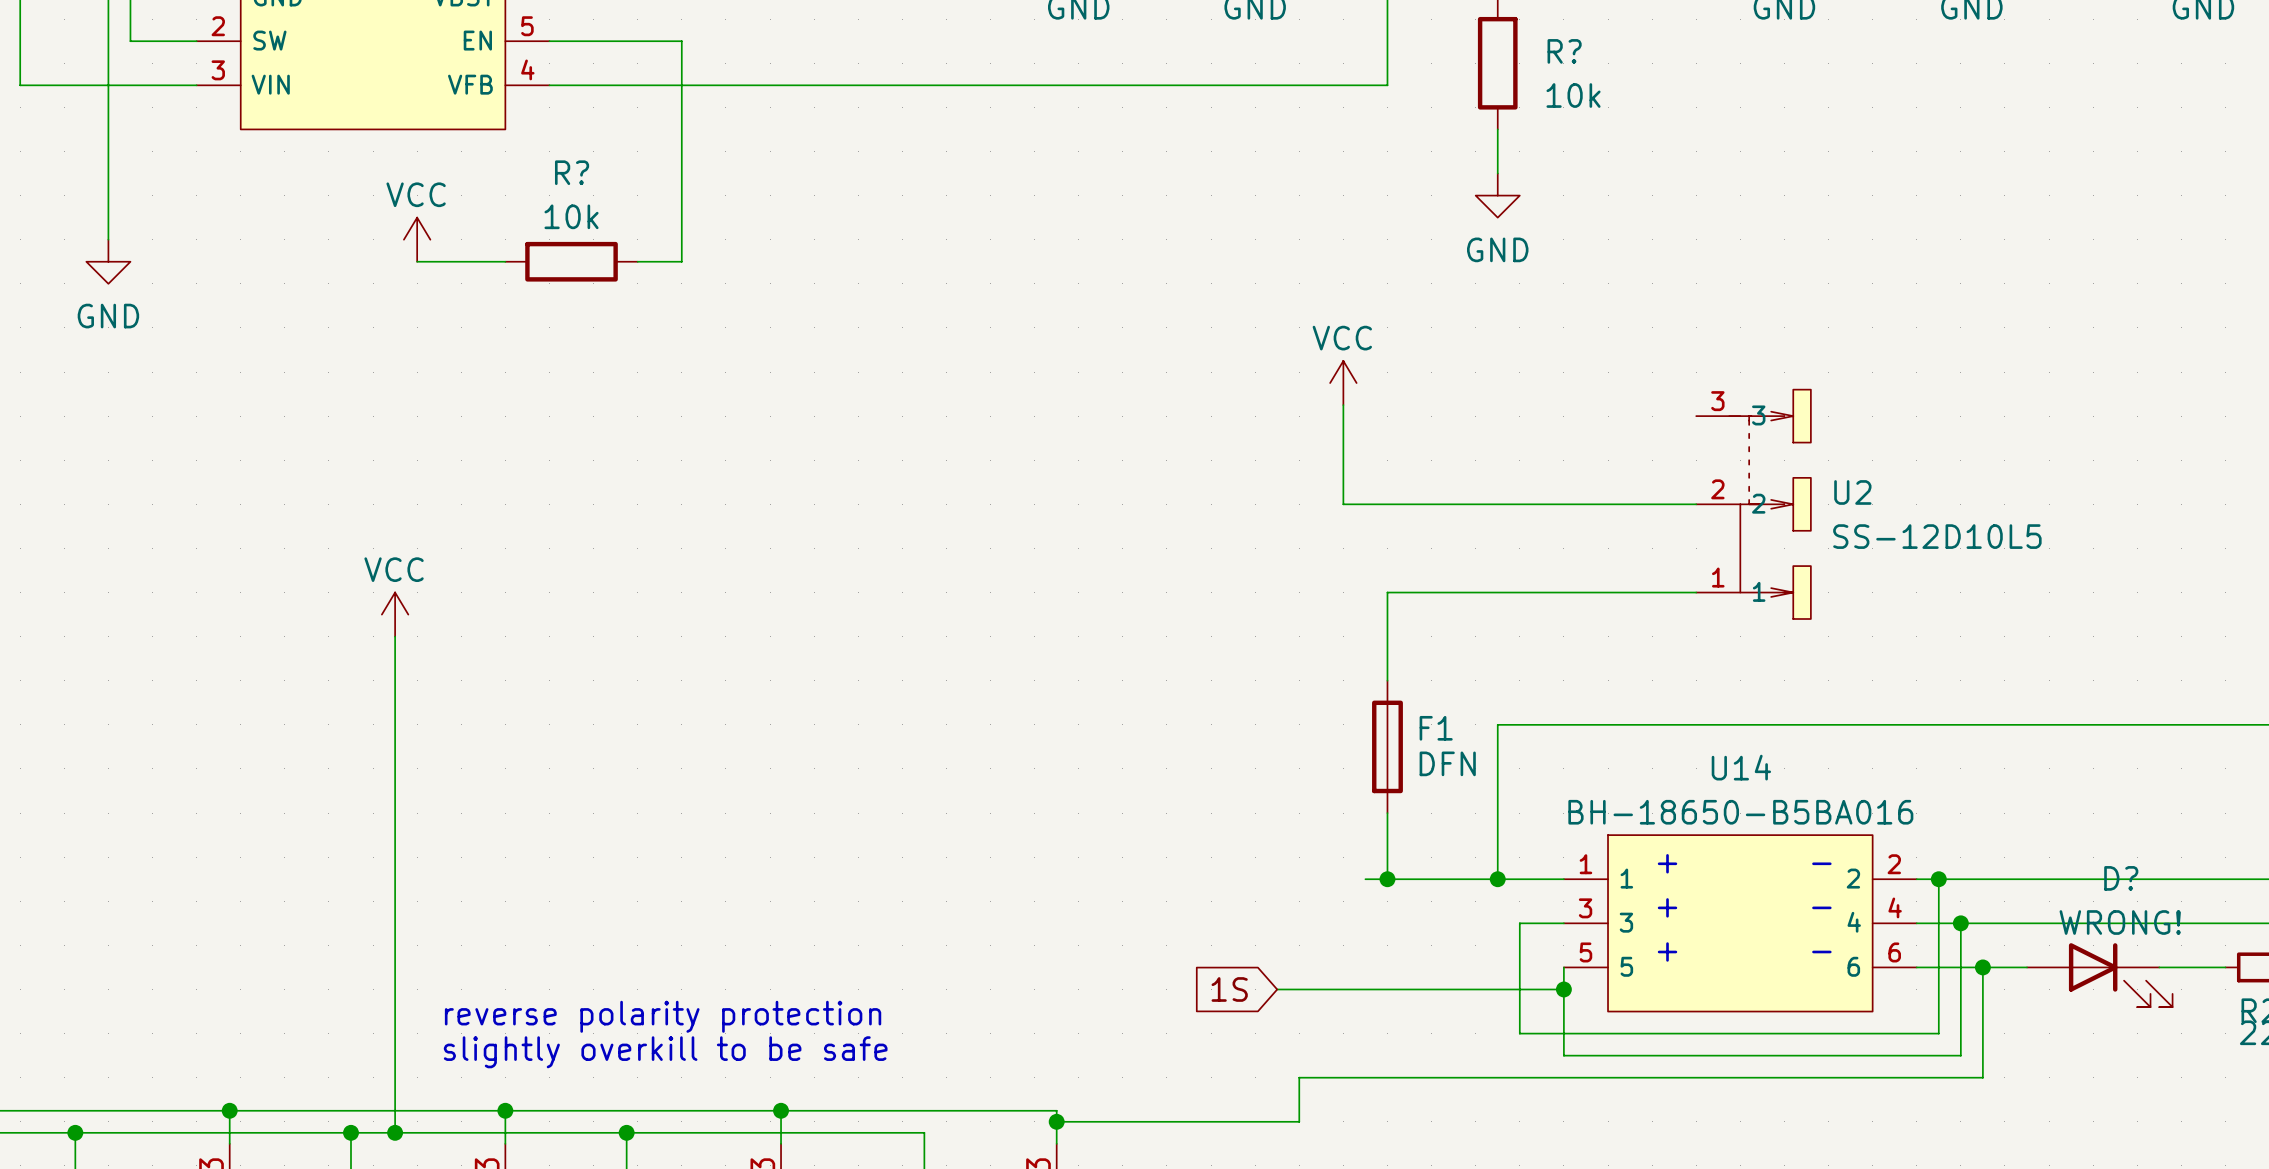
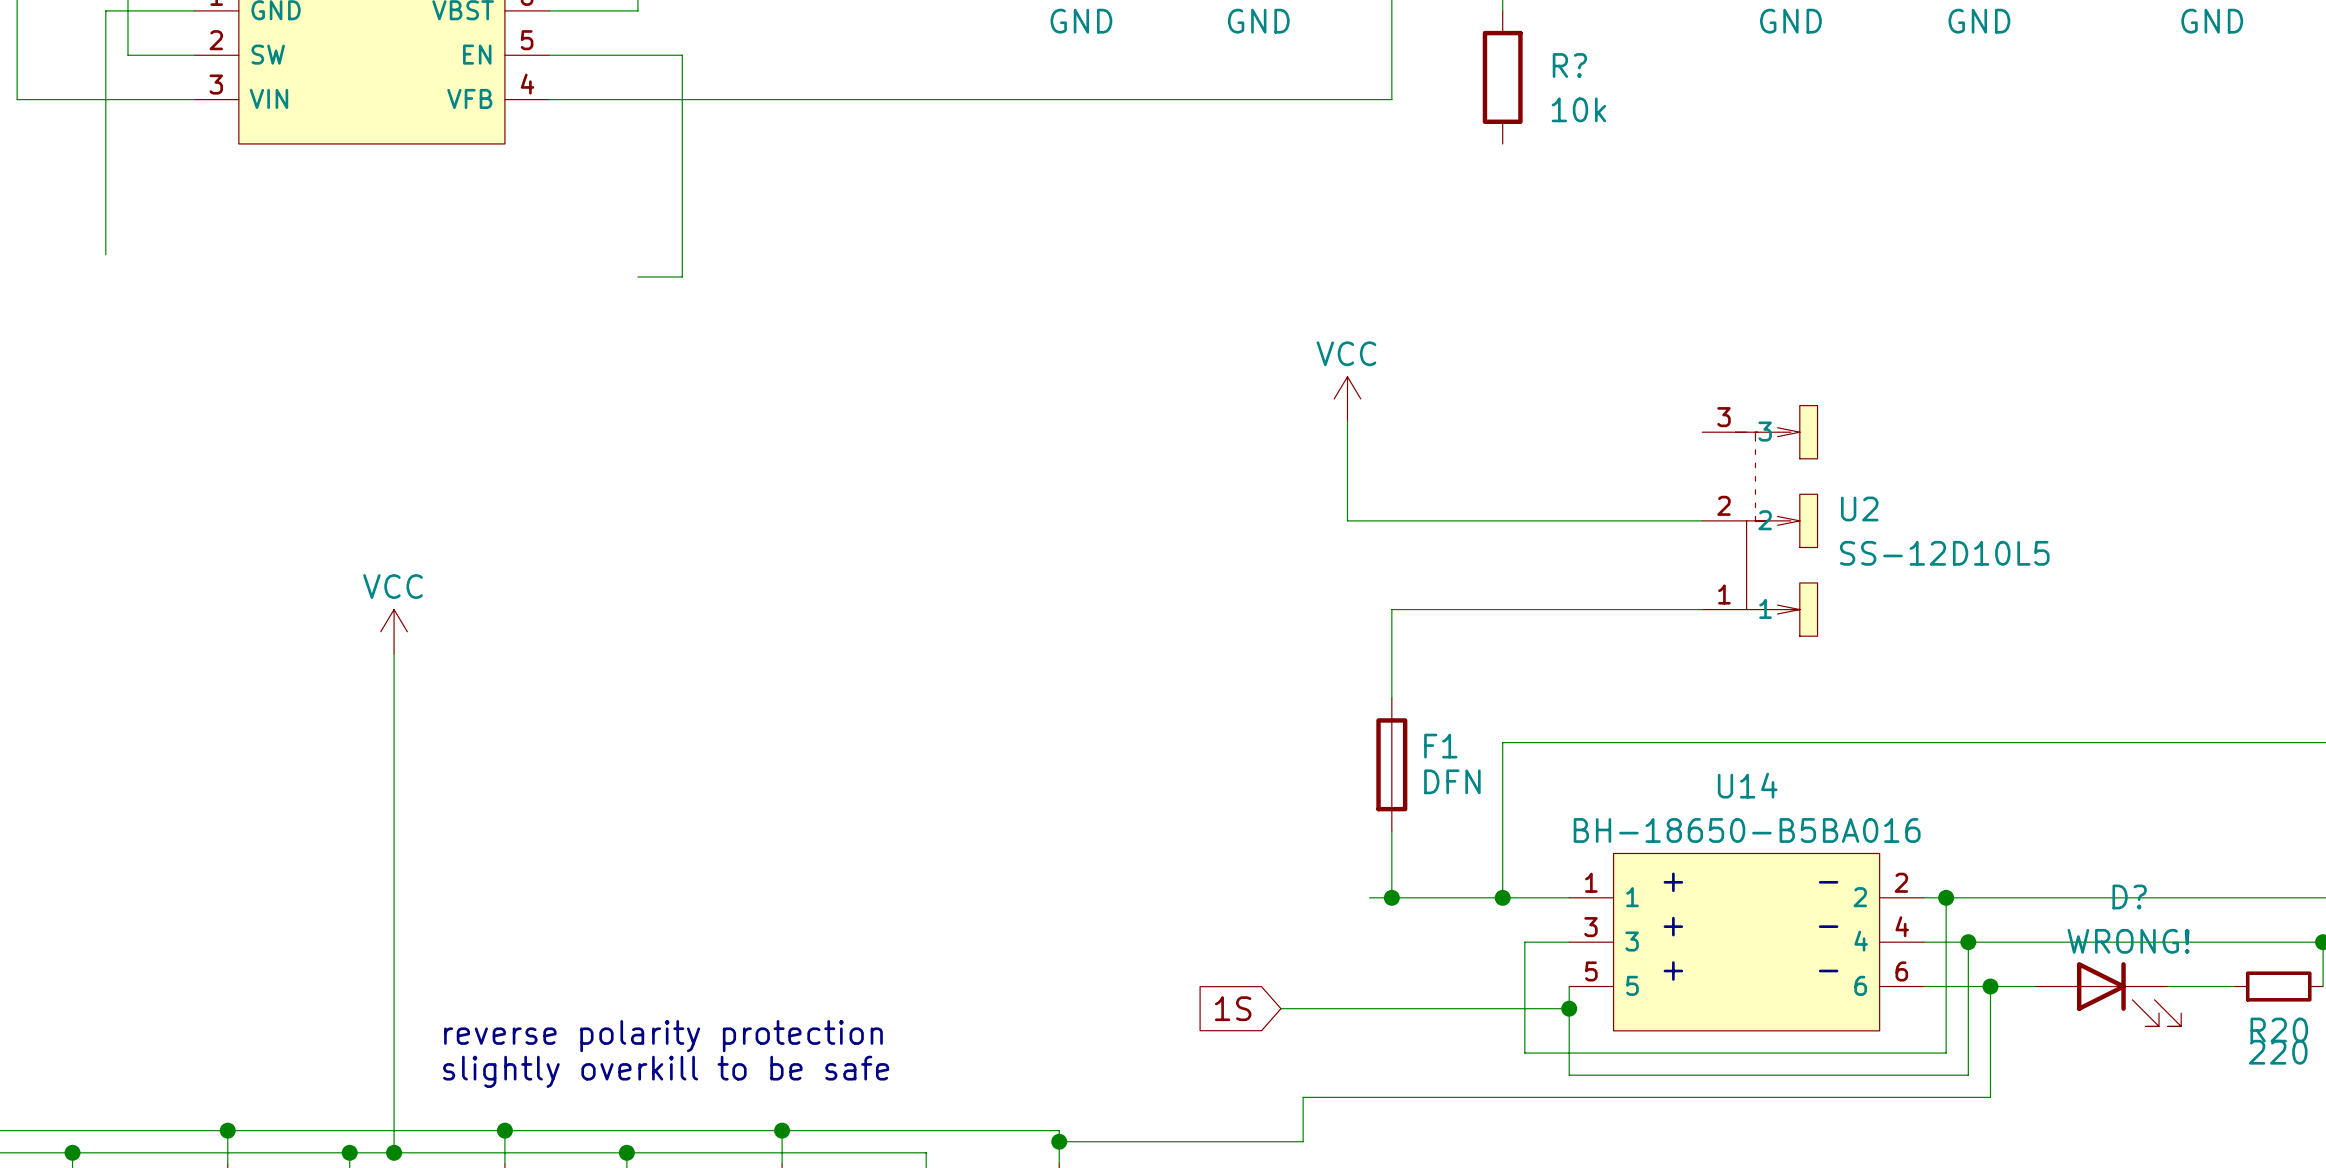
wire: (1497, 129) (1497, 173) -> none
power symbol: GND (1497, 195) -> none
power symbol: VCC (417, 239) -> none
power symbol: GND (108, 261) -> none
wire: (417, 261) (505, 261) -> none
R?: 10k (571, 261) -> none

